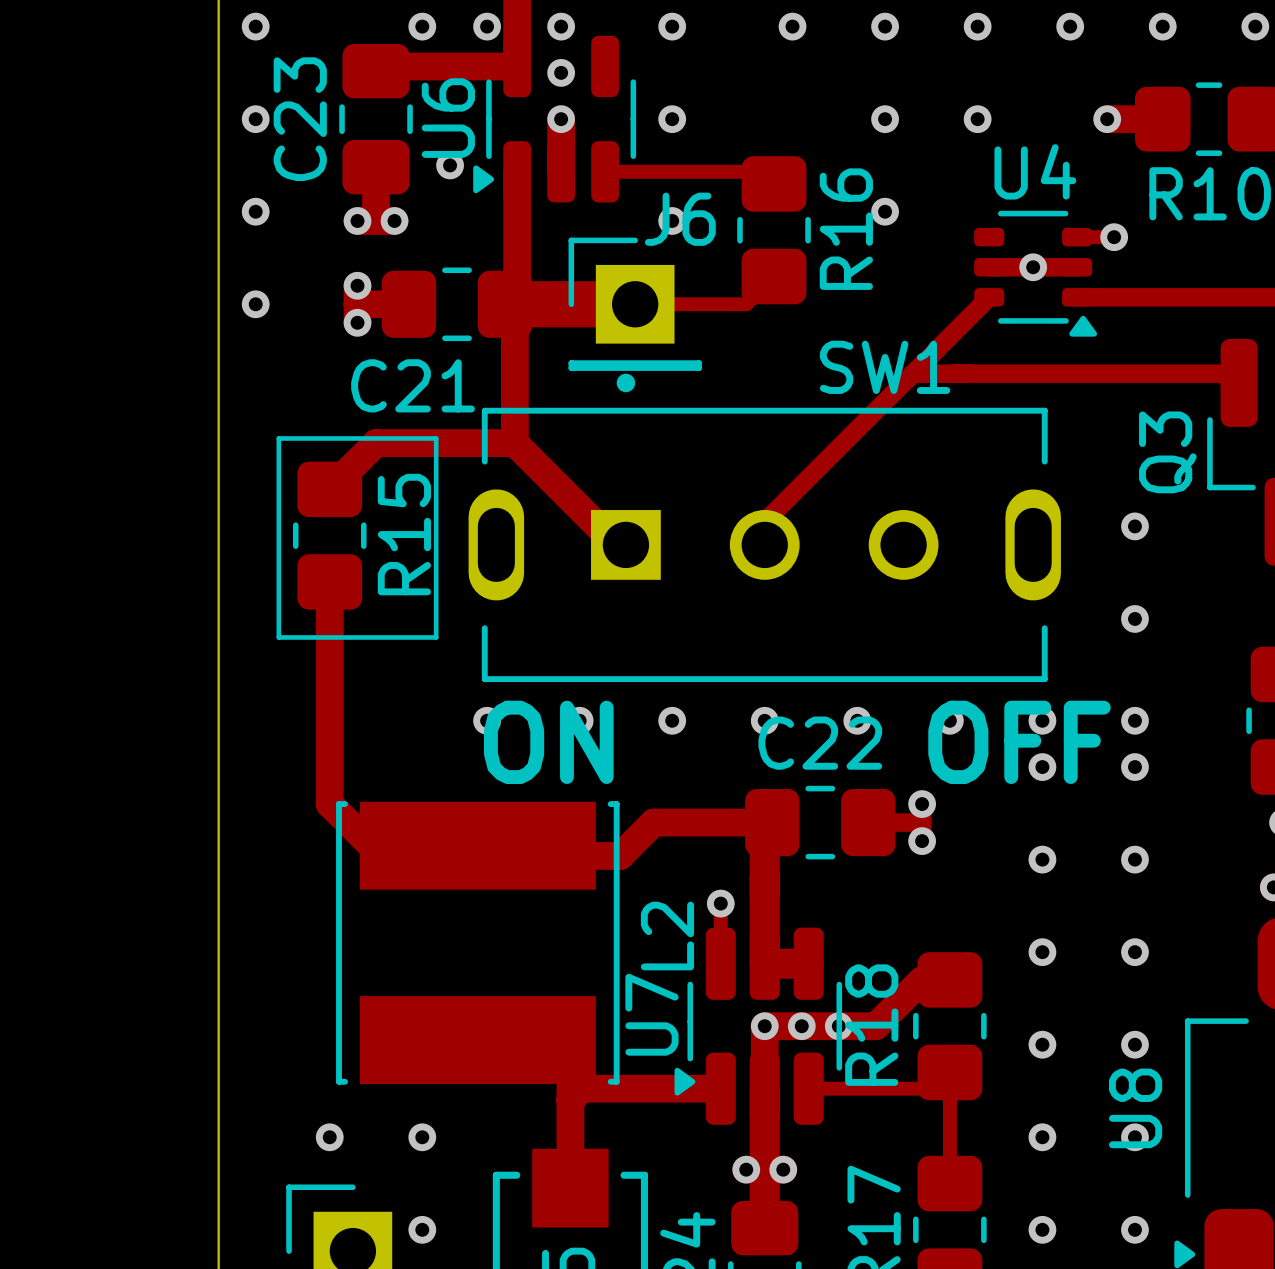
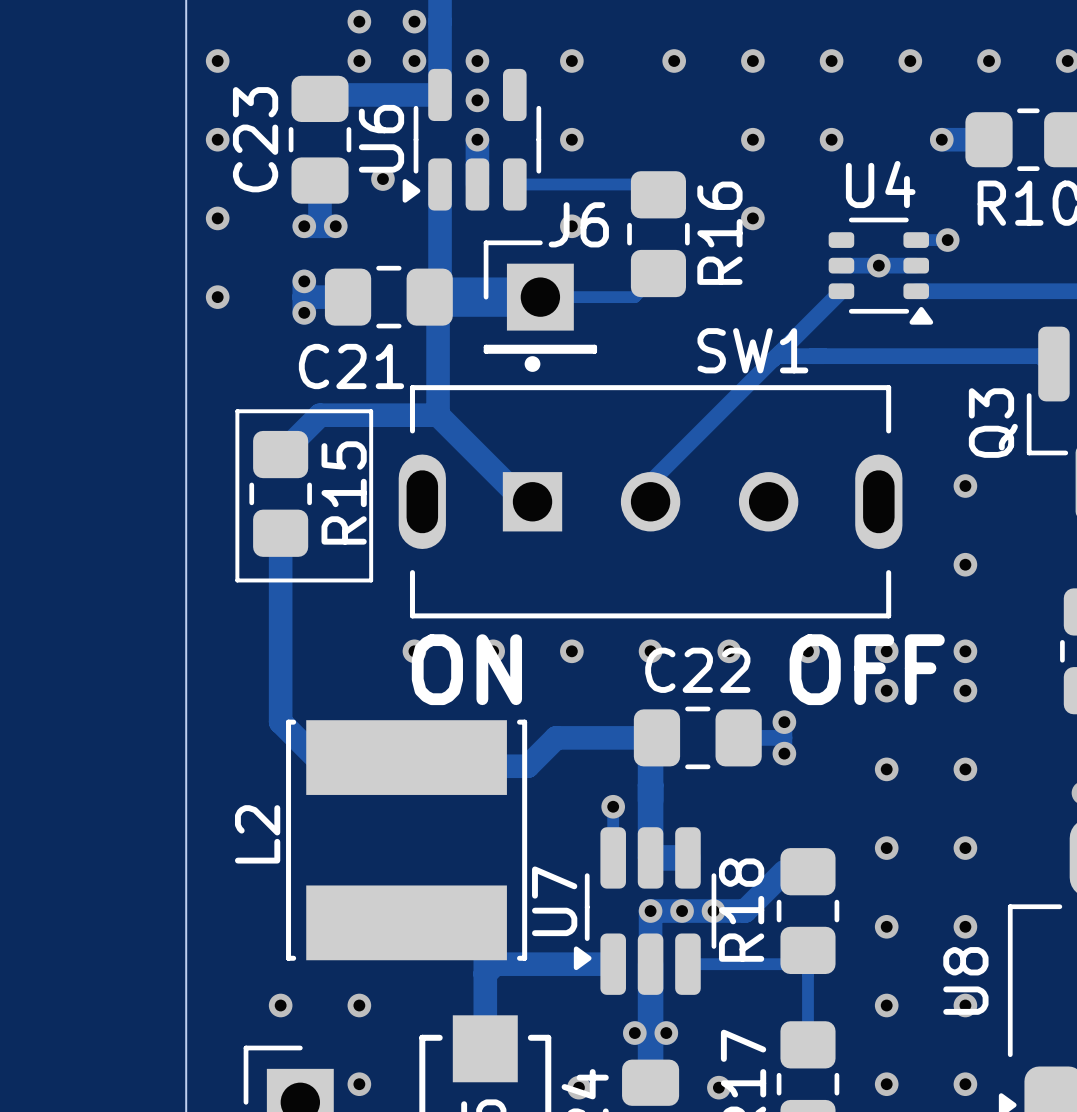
L2 name position: L2 (667, 936) -> L2 (257, 834)
via: none -> (578, 1087)
via: none -> (718, 1087)

